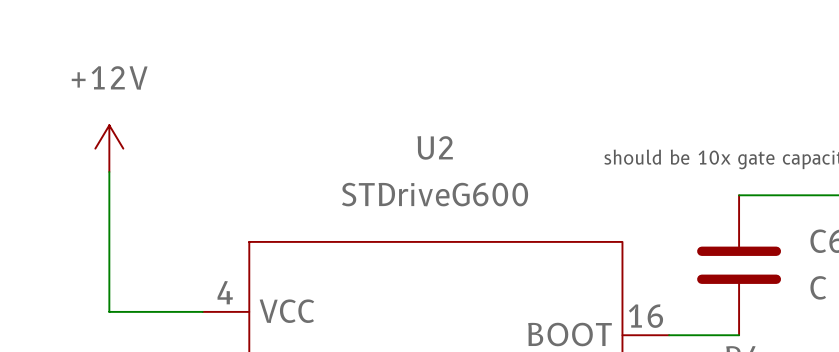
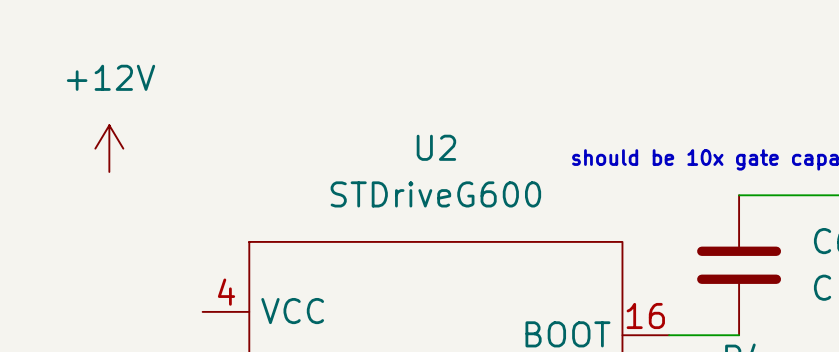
wire: (109, 171) (109, 311) (202, 311) -> none

